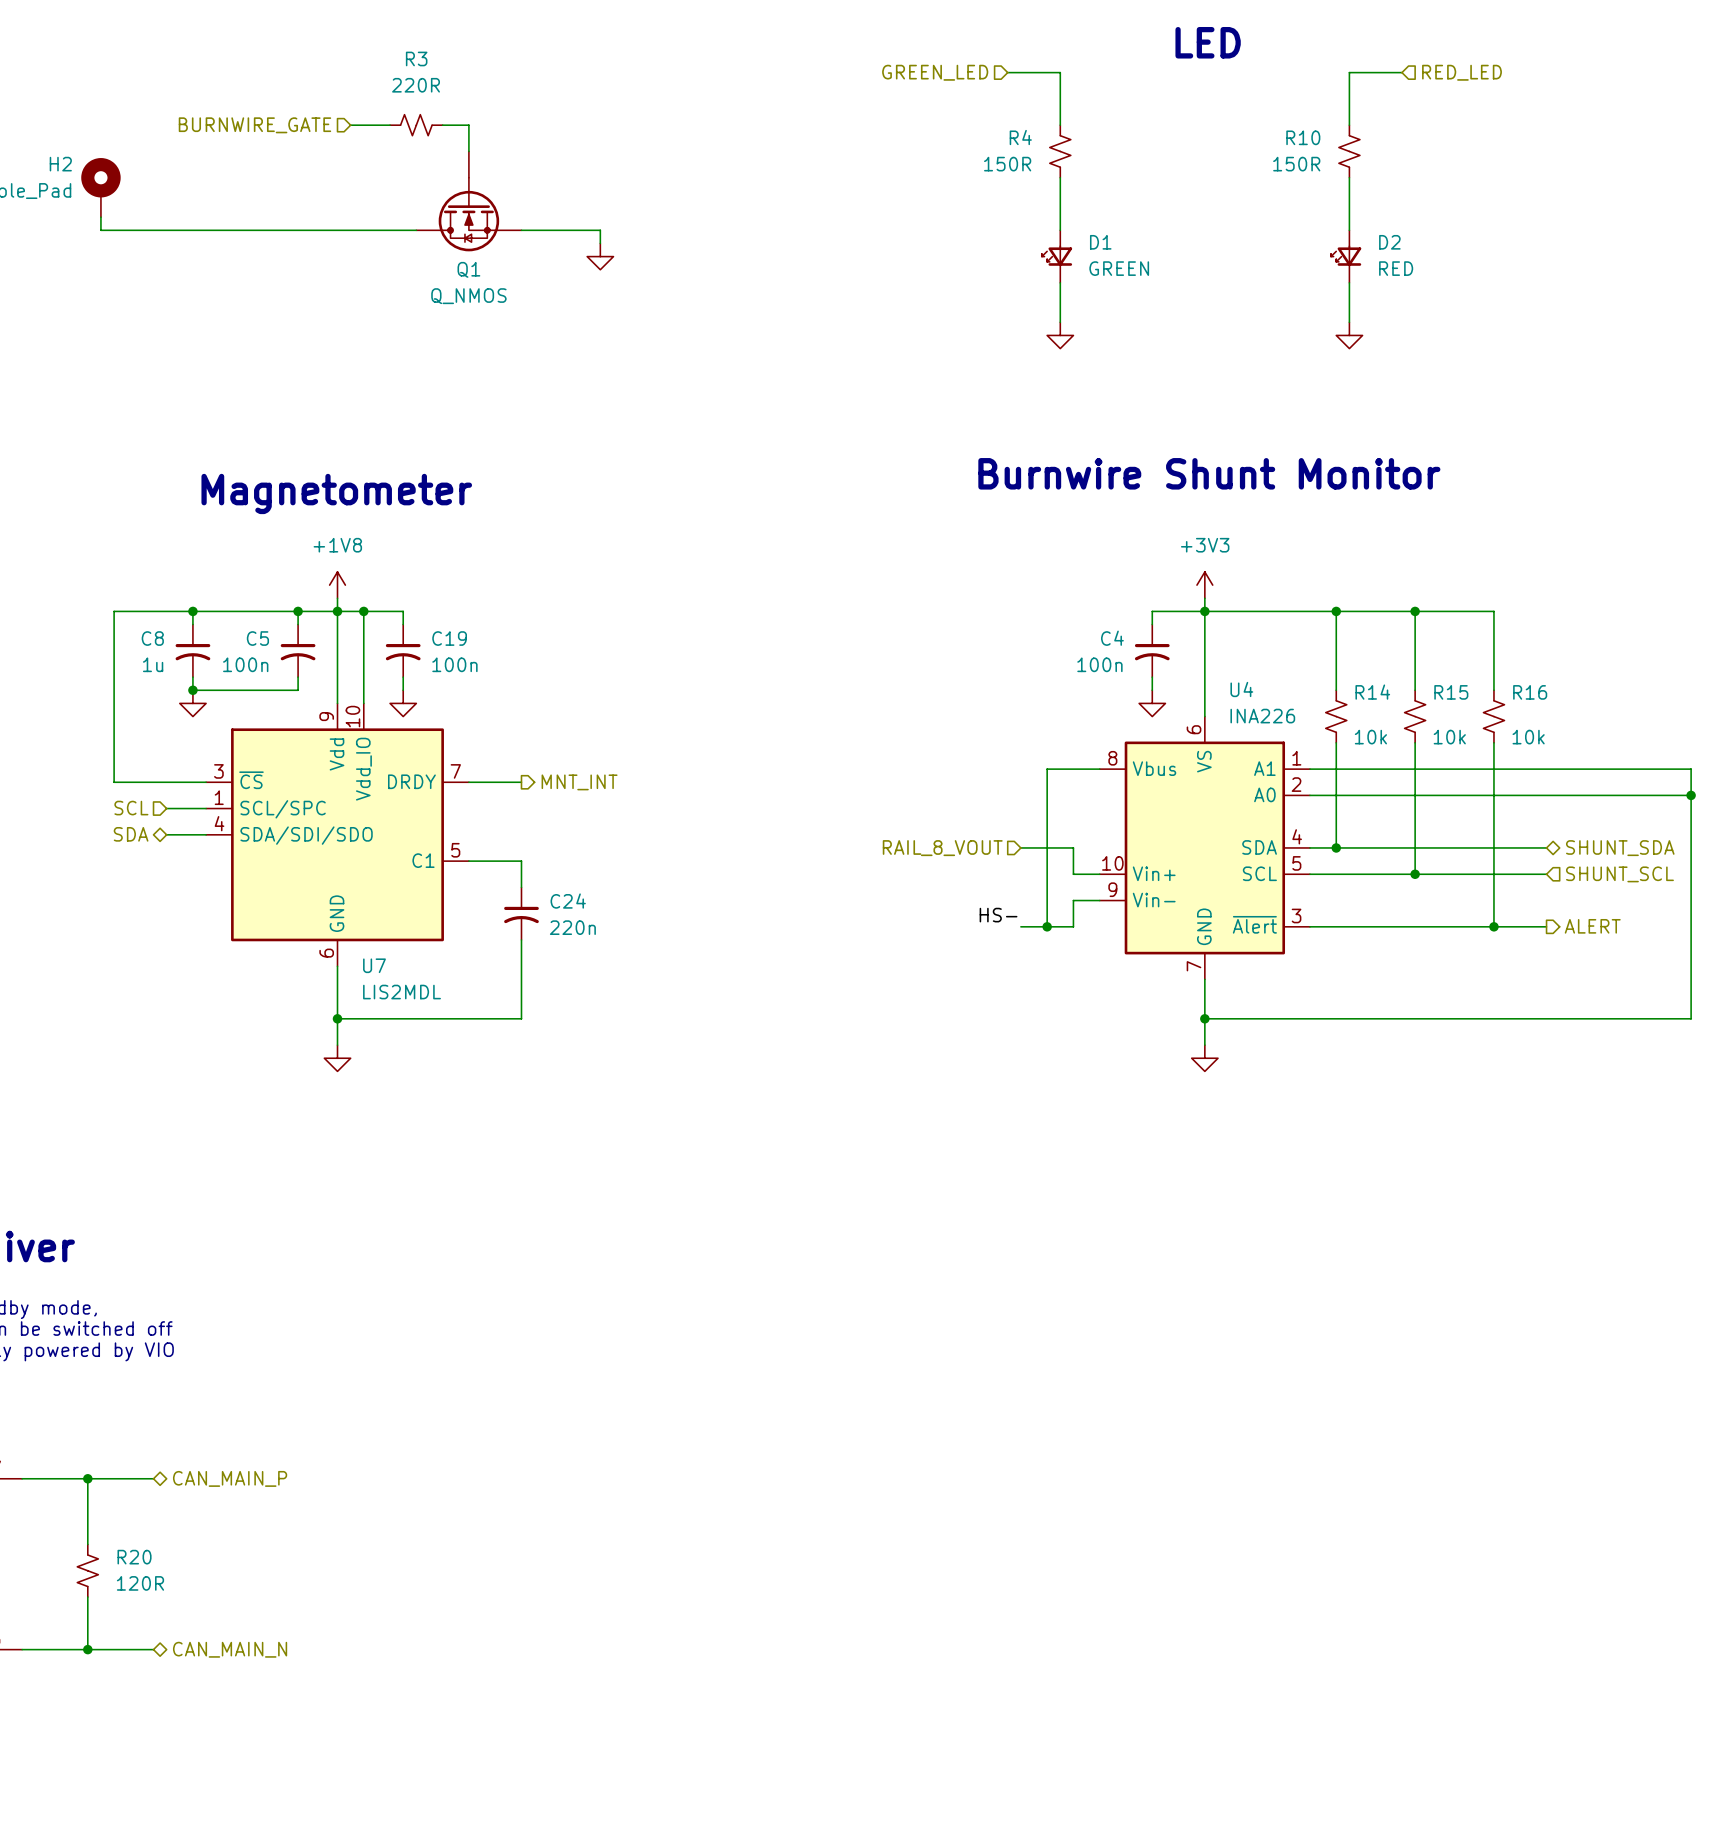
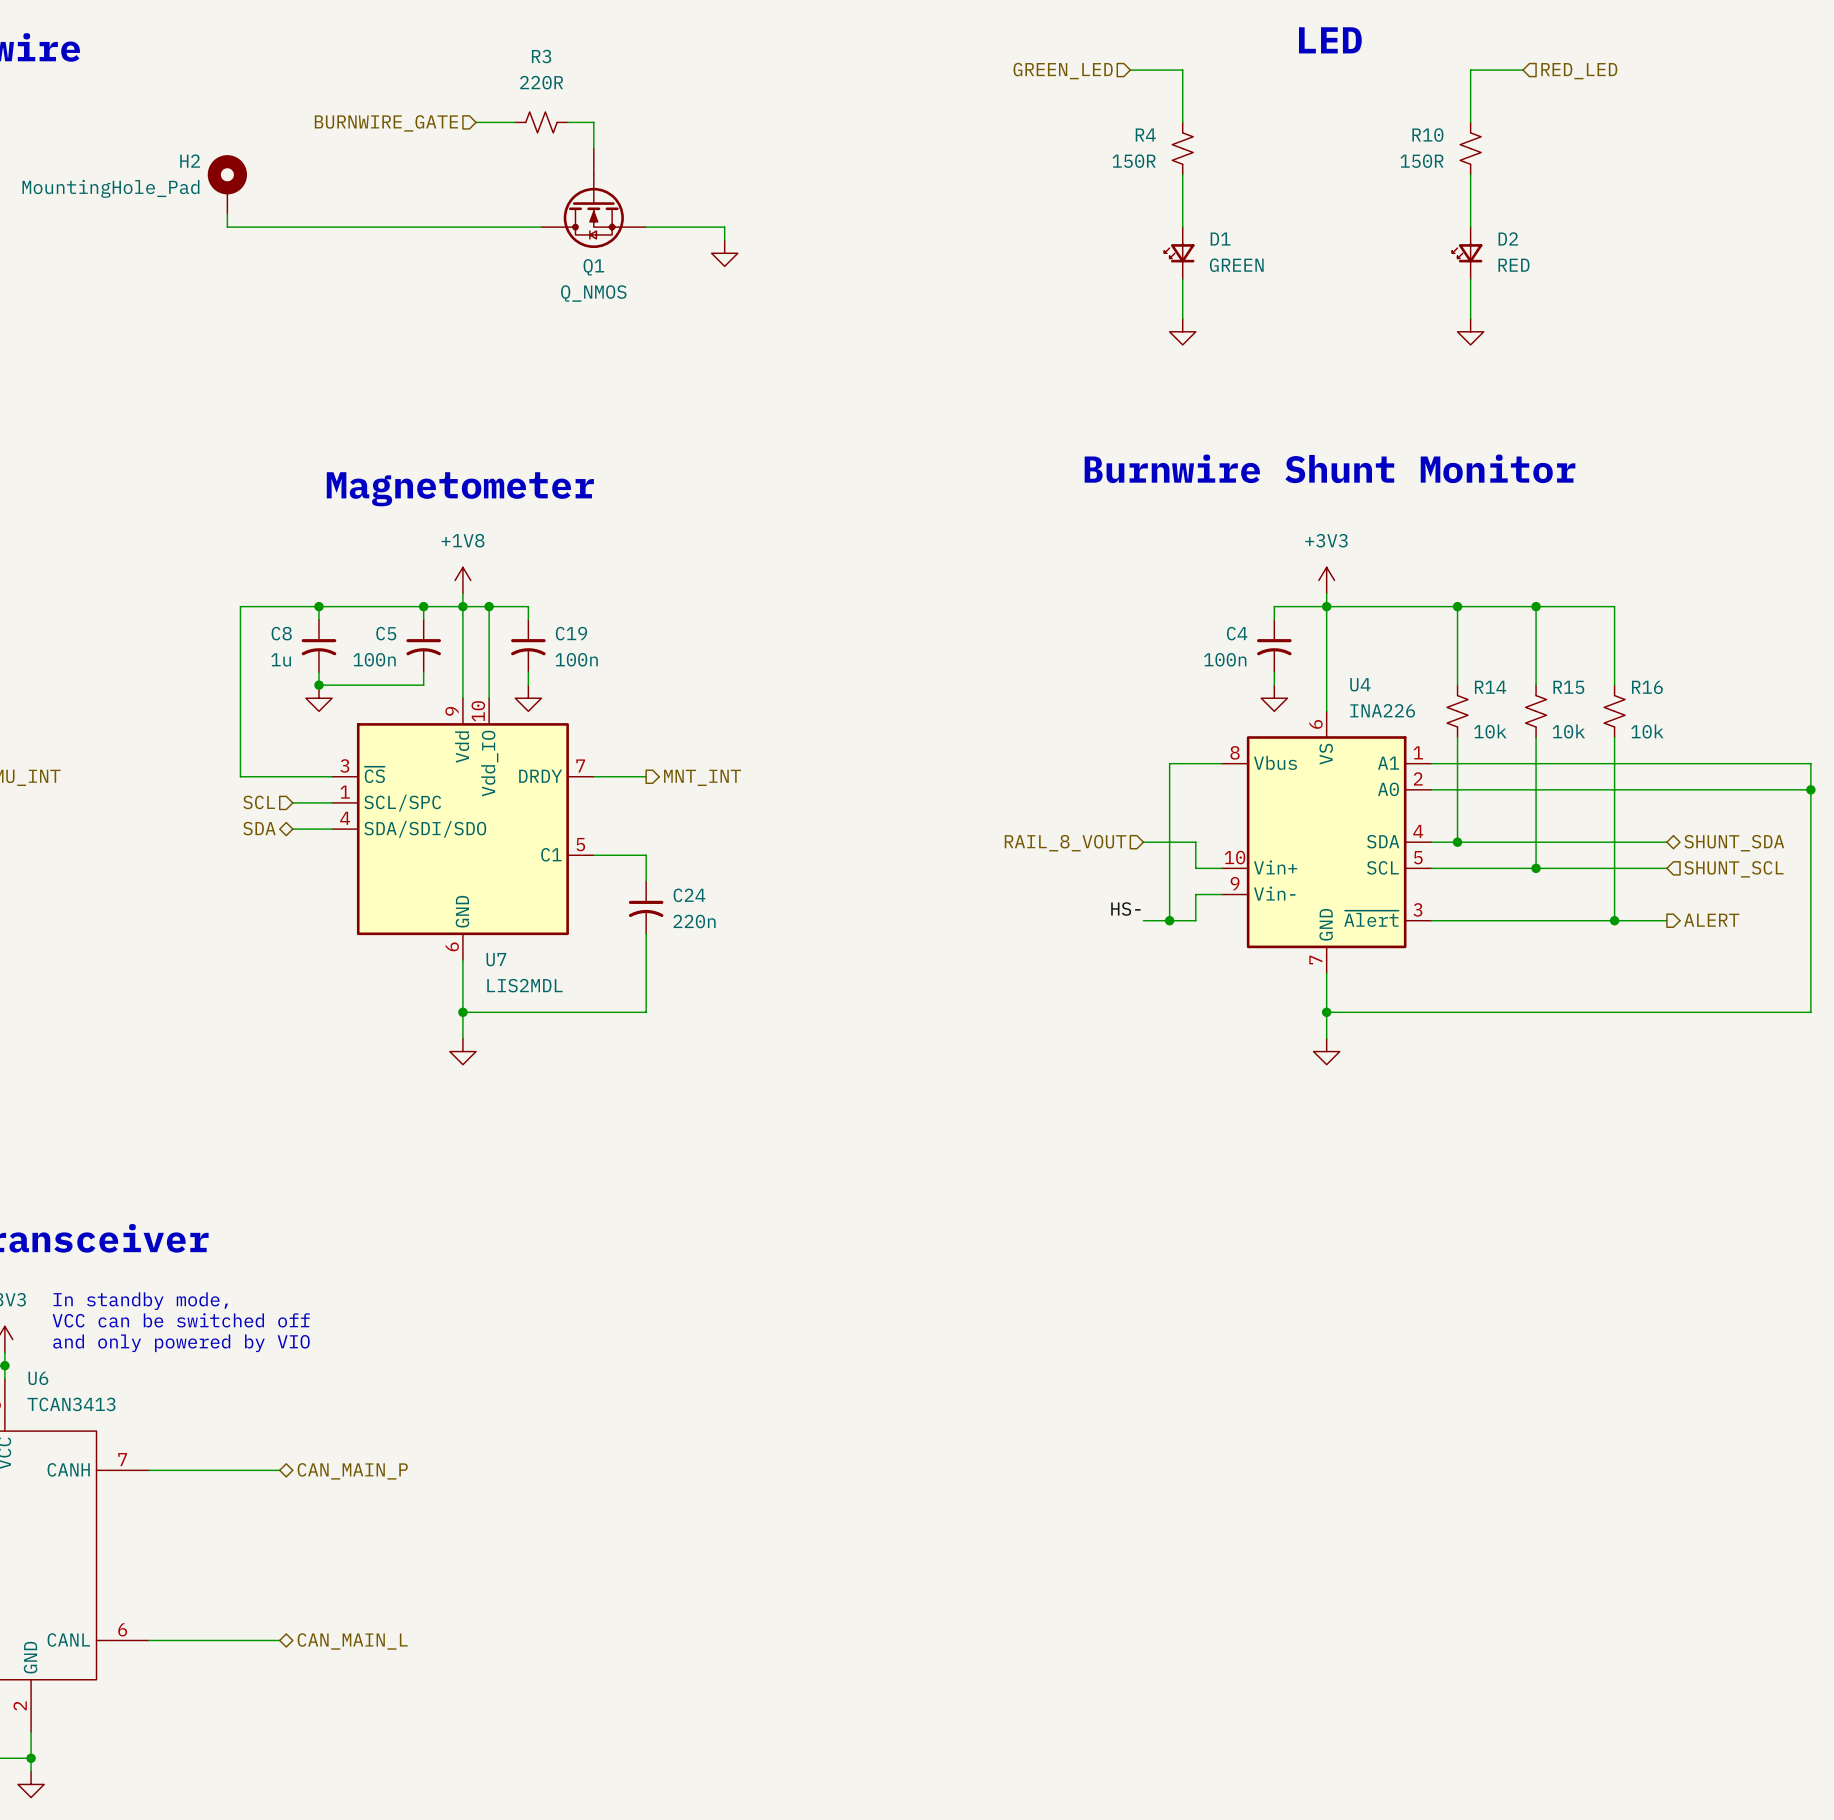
wire: (87, 1478) (87, 1544) -> none
junction: (87, 1478) -> none
R20: 120R (87, 1570) -> none
wire: (87, 1597) (87, 1649) -> none
junction: (87, 1649) -> none
hierarchical label: CAN_MAIN_N (230, 1649) -> CAN_MAIN_L (352, 1641)

